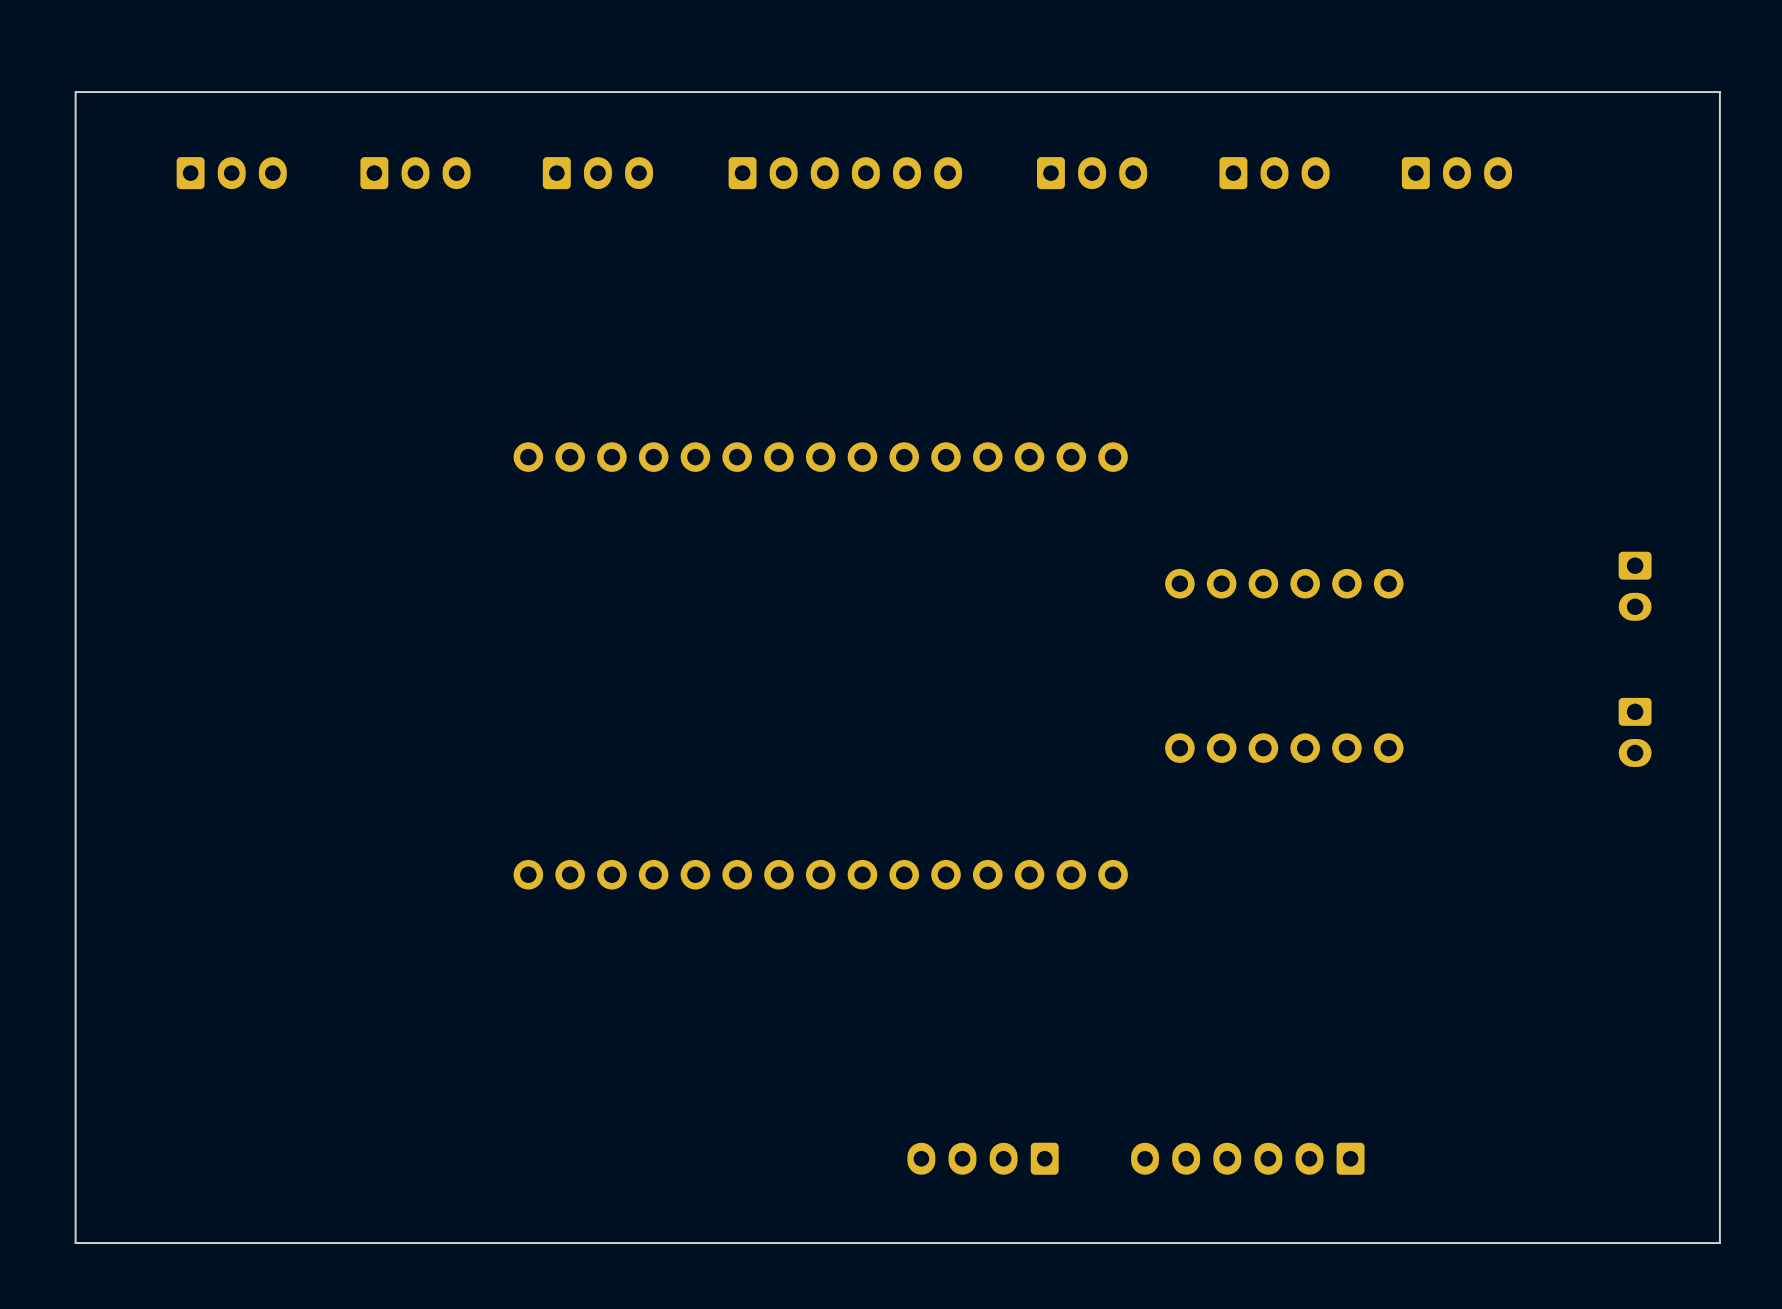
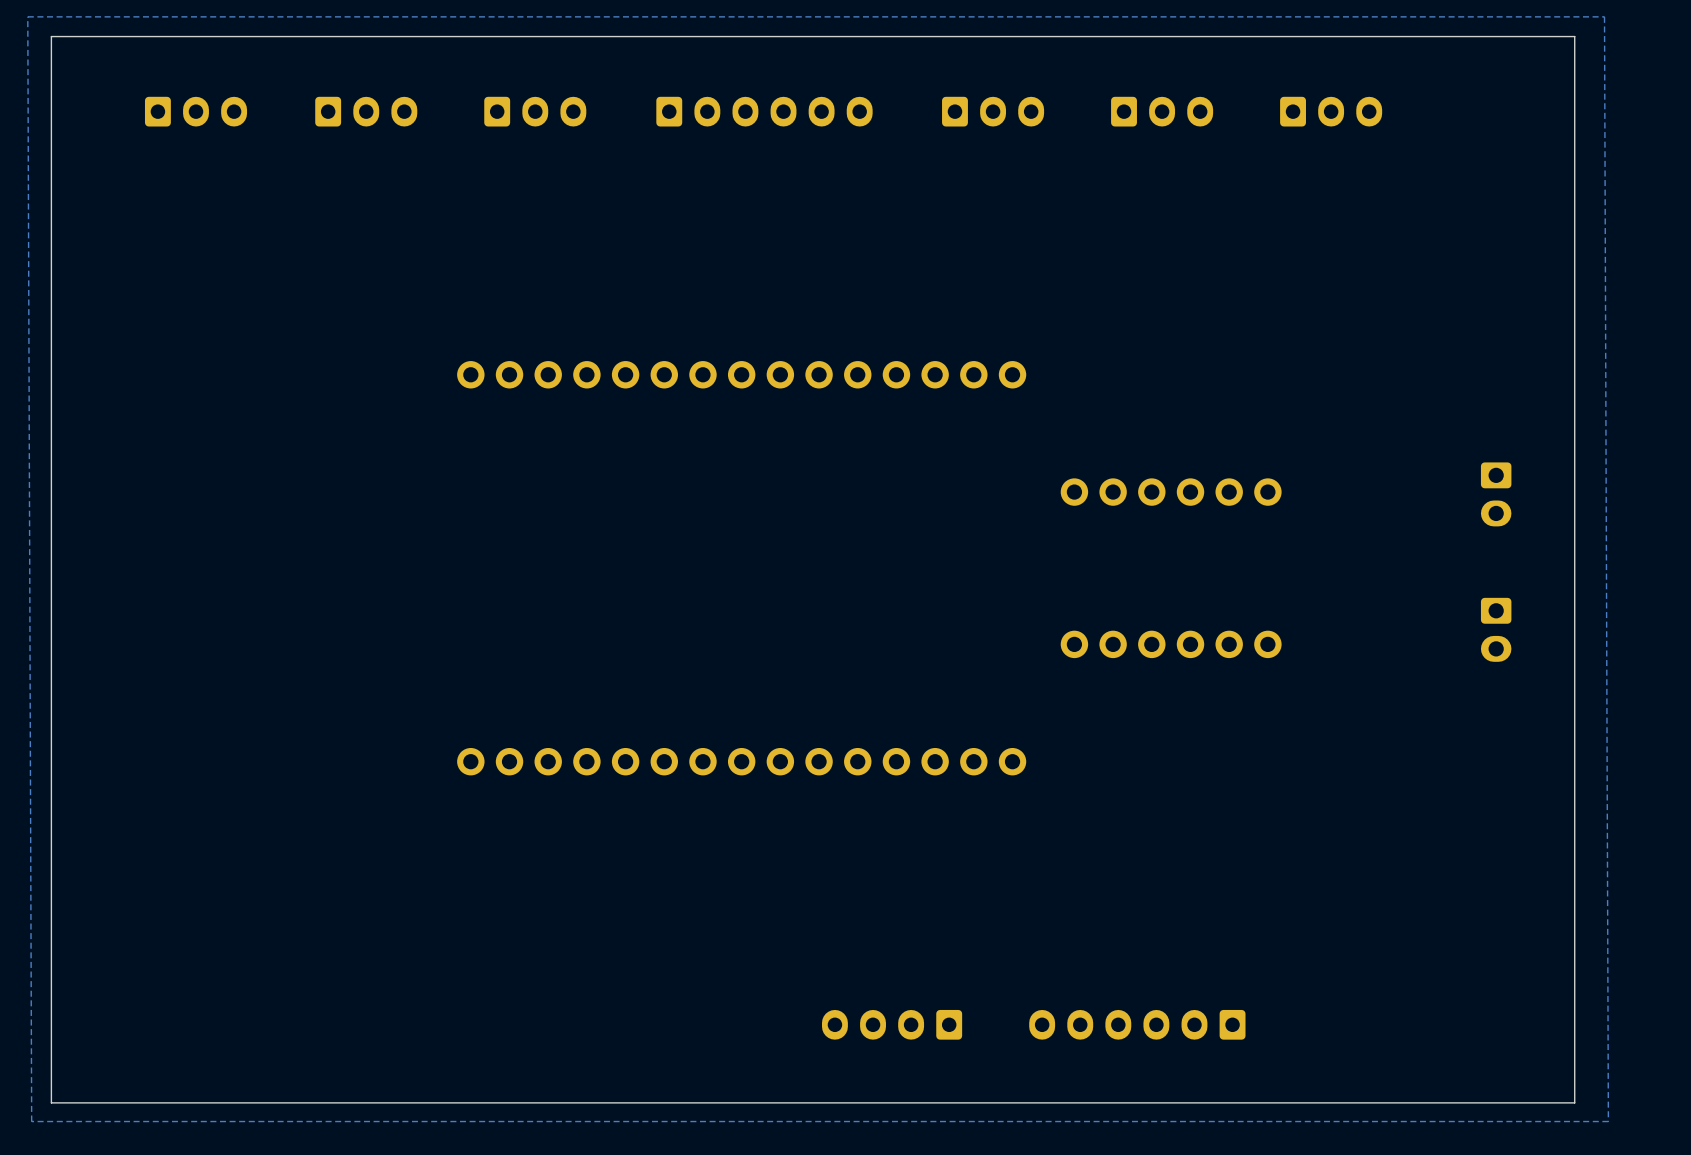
zone outline: none -> (1604, 16) (1608, 1121) (31, 1121) (27, 16) (1604, 16)

